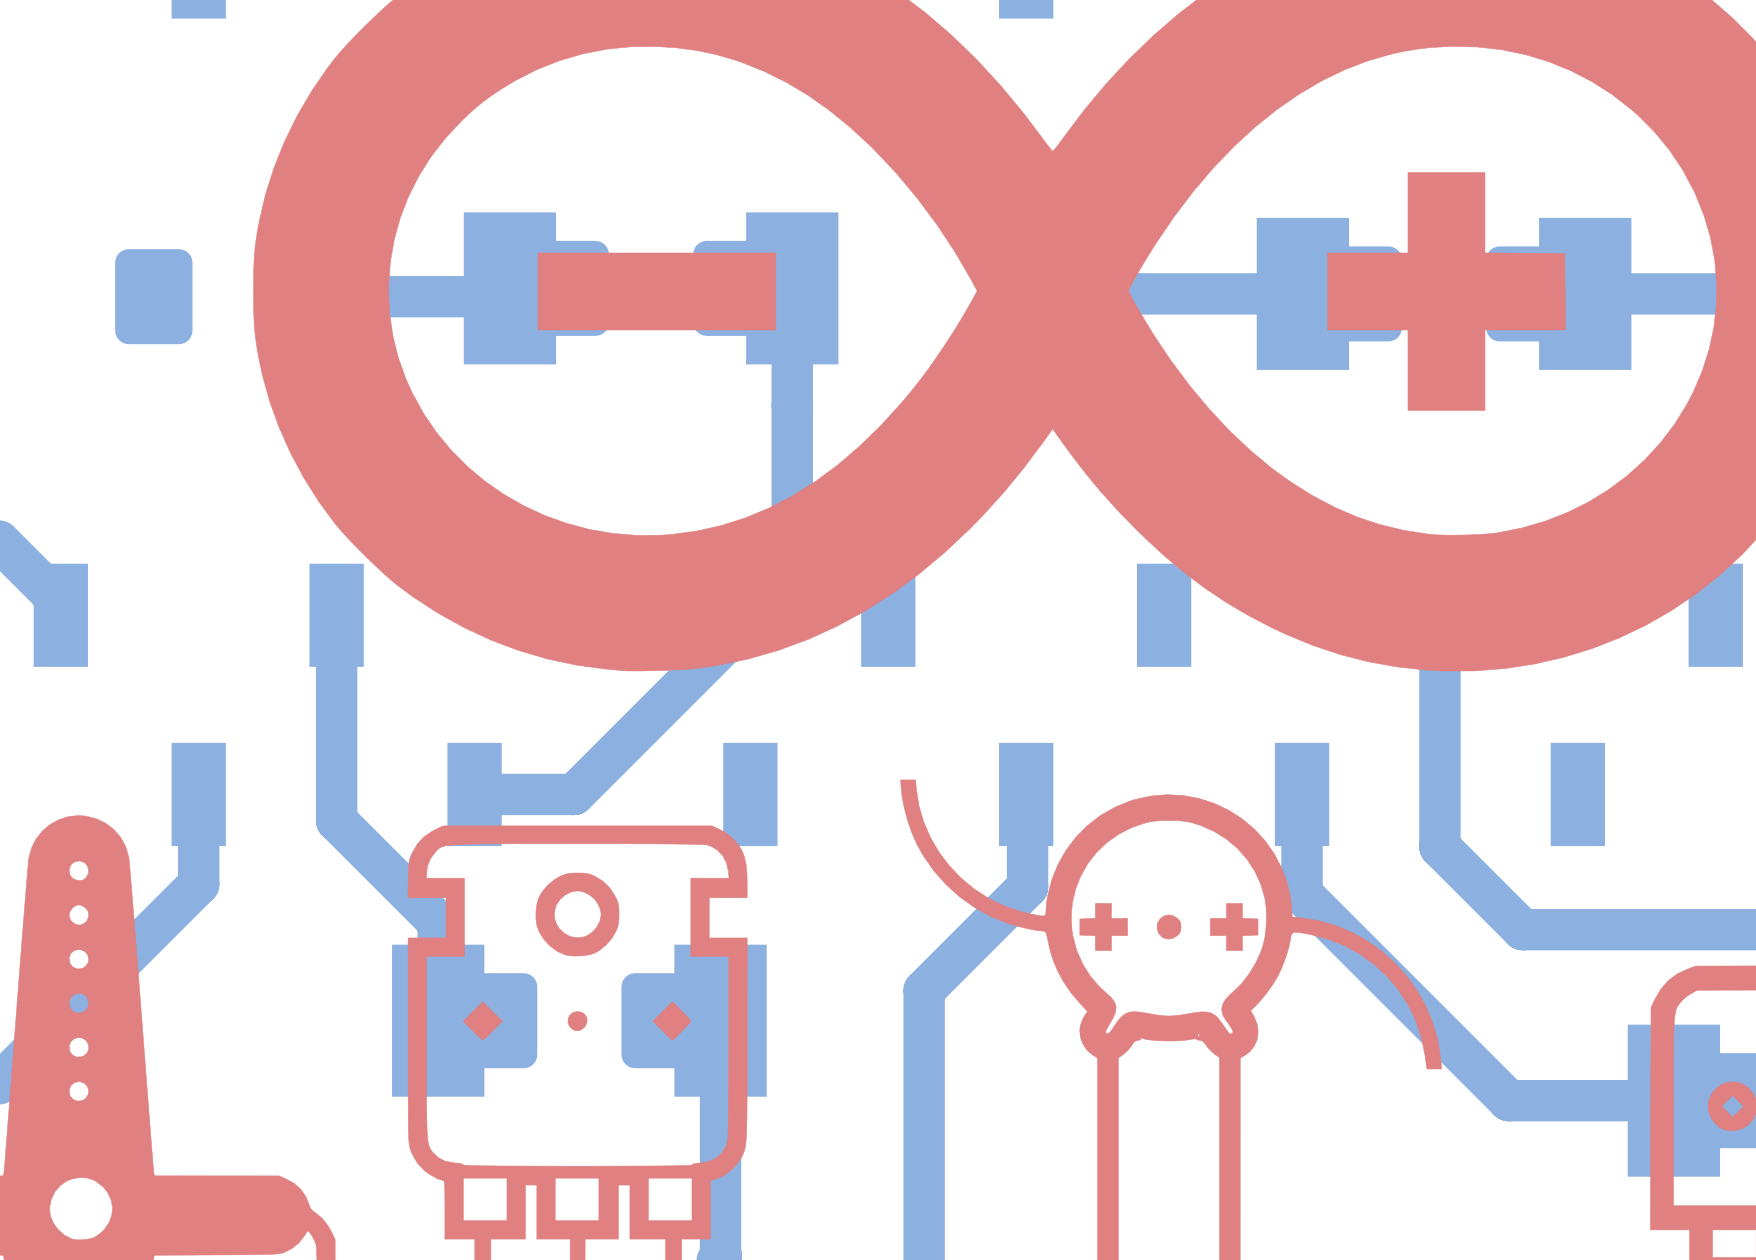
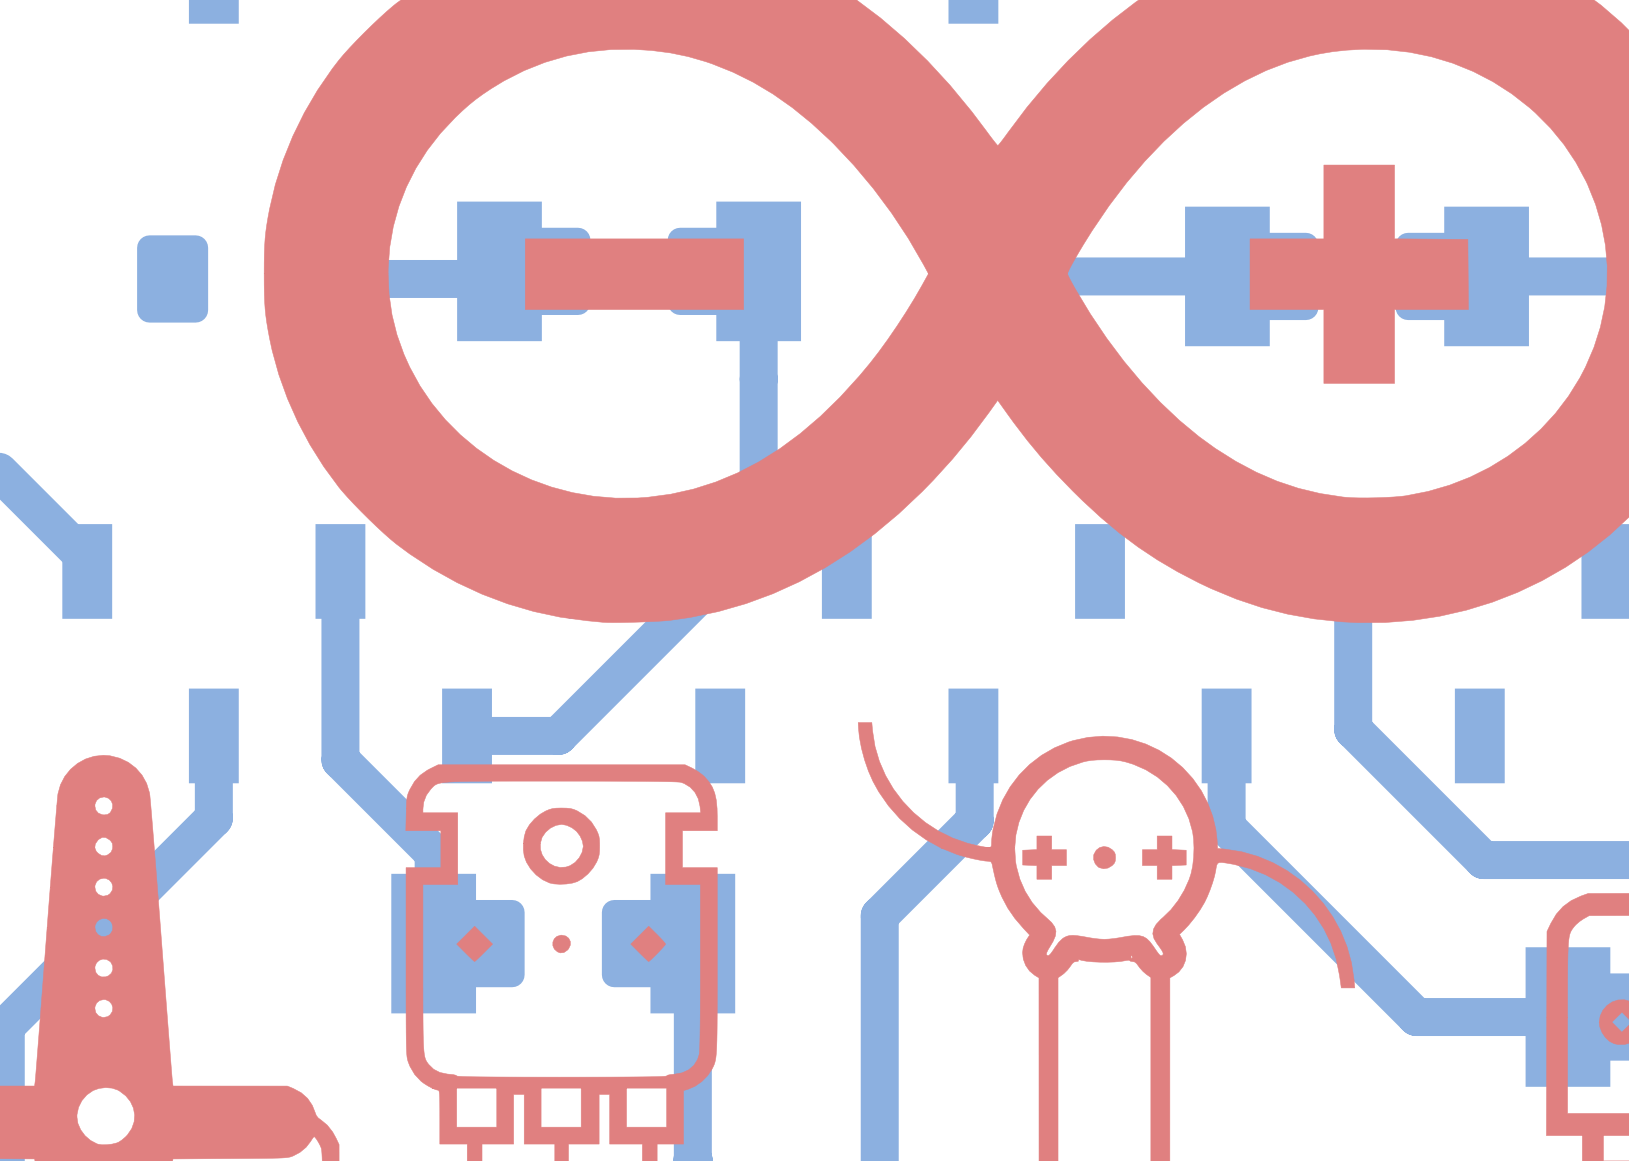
bottom track: (1439, 787) (1439, 846) (1522, 929) (1581, 929) -> (1353, 729) (1483, 860)

